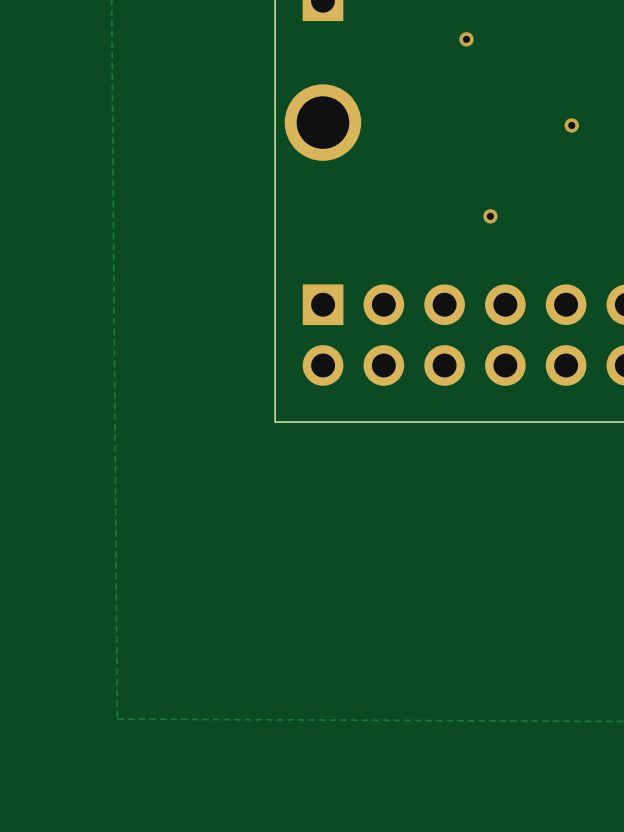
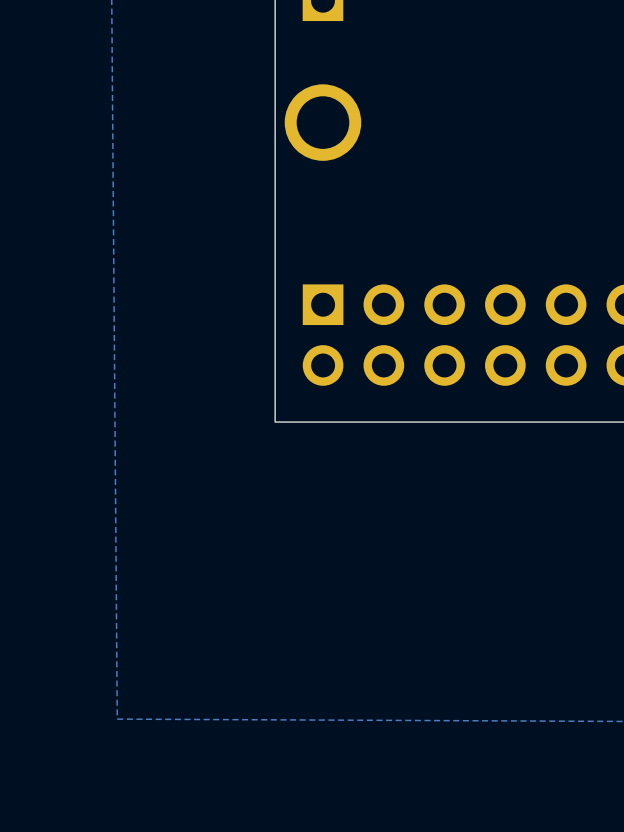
via: (466, 39) -> none
via: (571, 125) -> none
via: (490, 216) -> none

